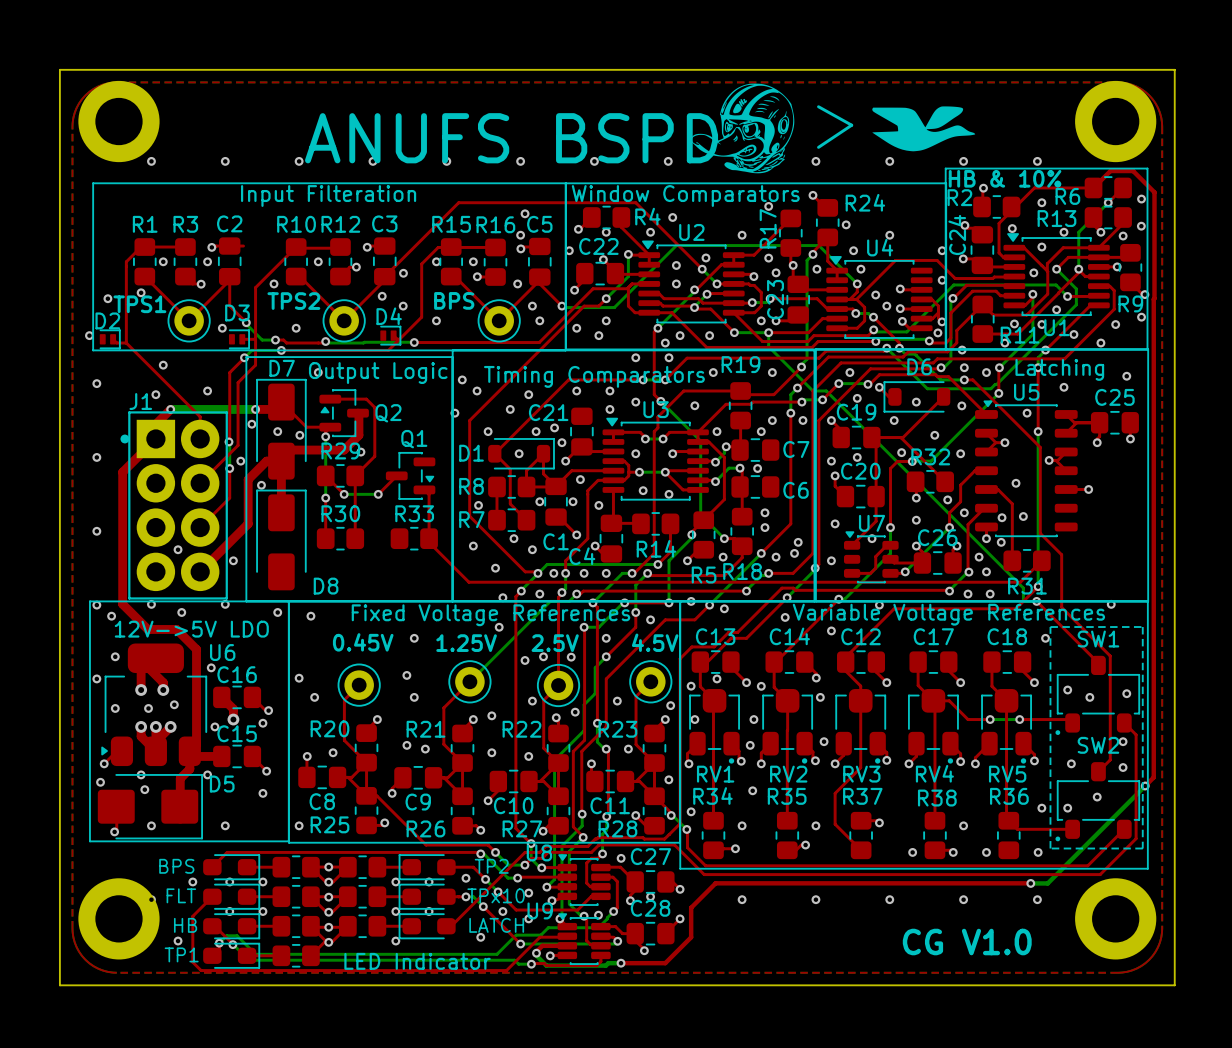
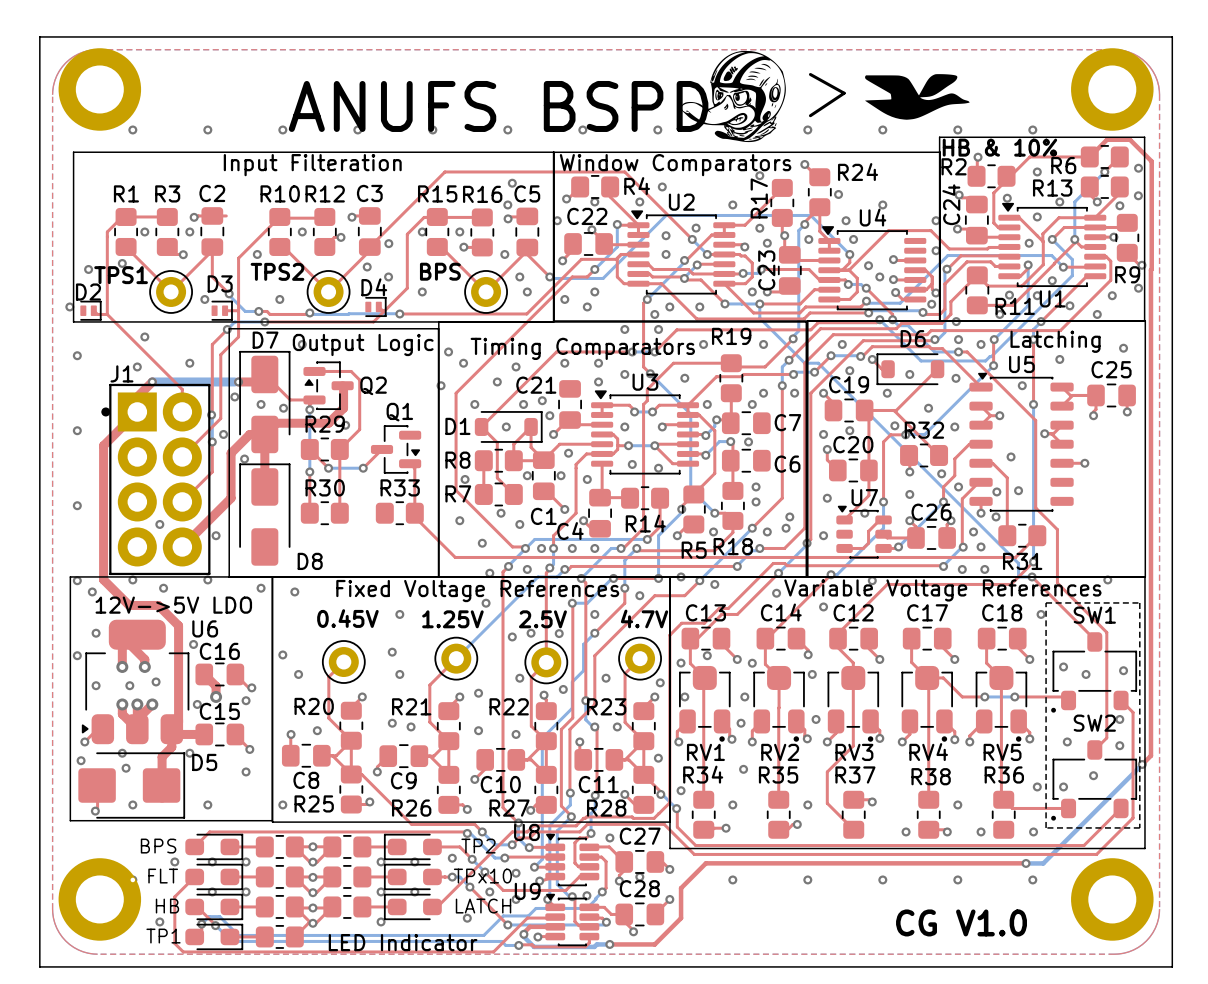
text: 4.5V (655, 642) -> 4.7V (644, 618)

